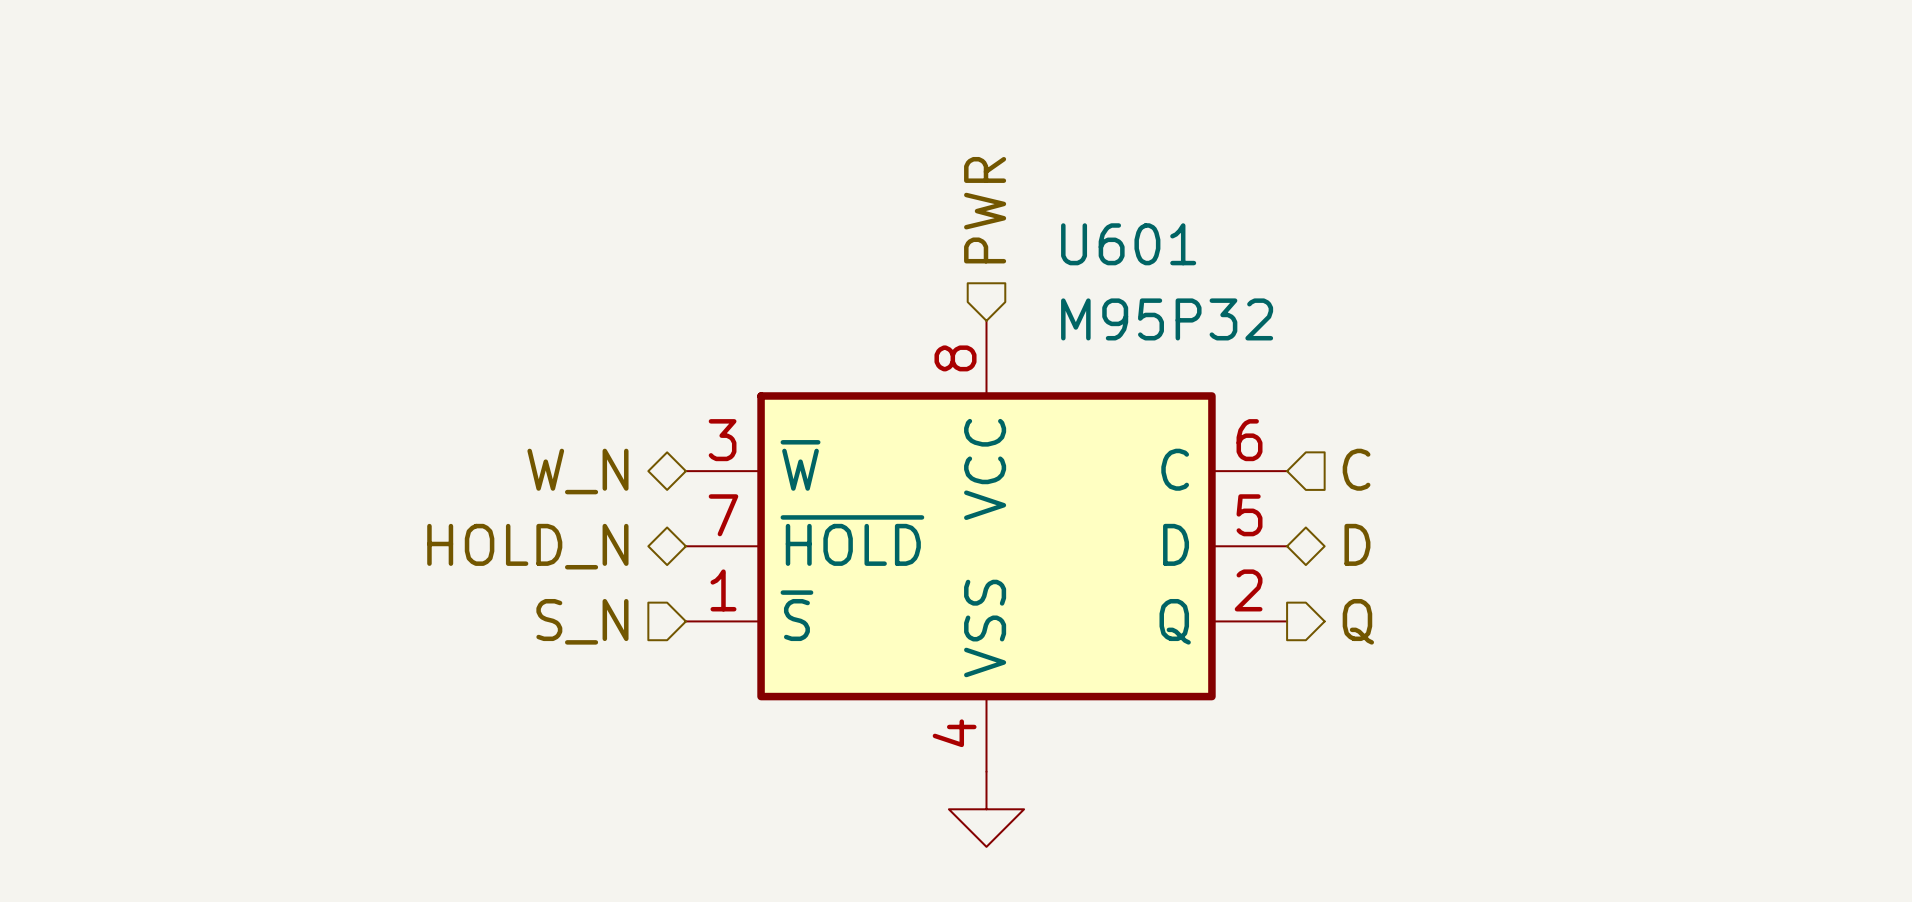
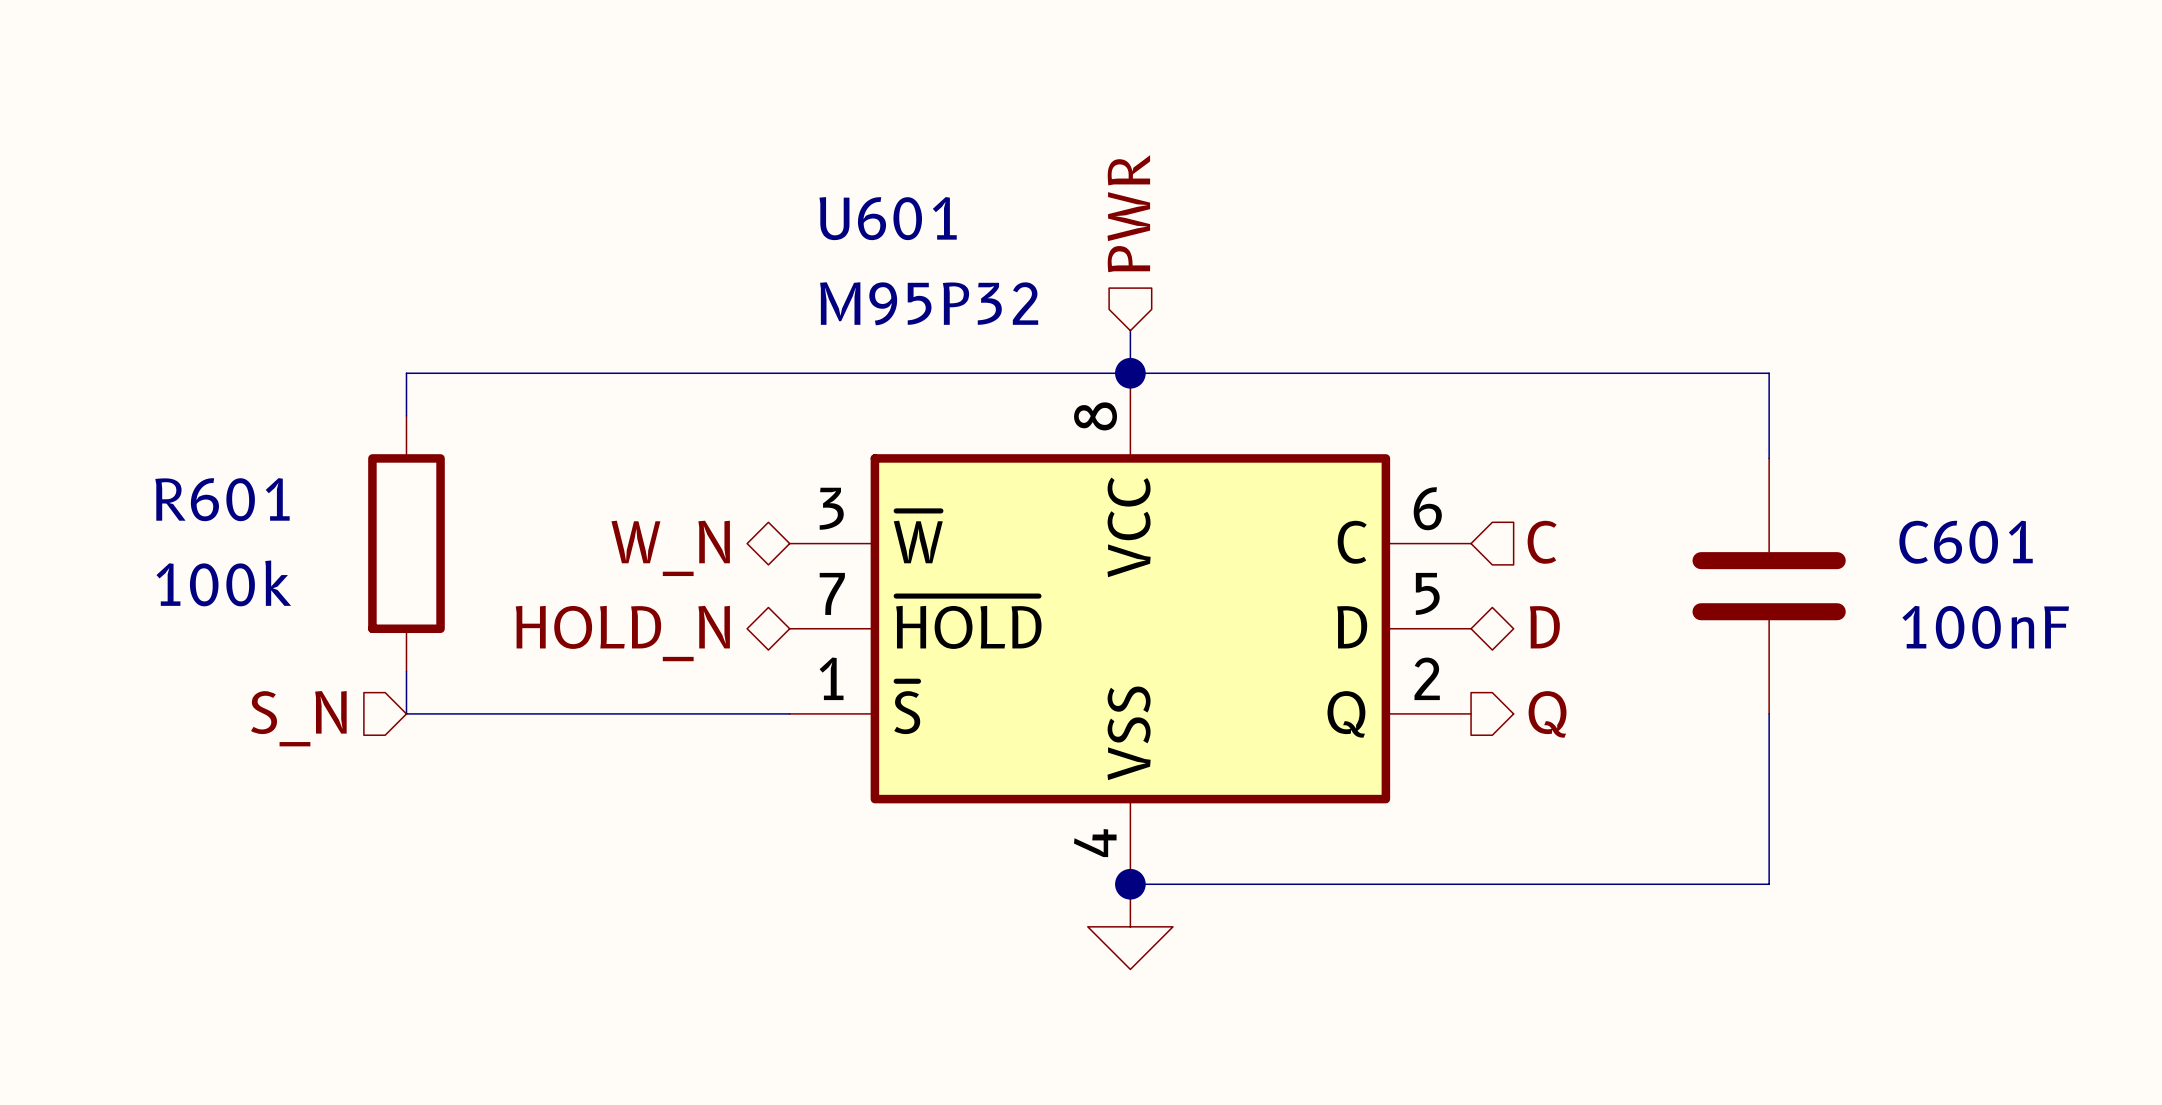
hierarchical label position: PWR (985, 210) -> PWR (1128, 213)
U601 name position: U601 (1128, 244) -> U601 (888, 218)
wire: none -> (1130, 330) (1130, 373)
U601 value position: M95P32 (1167, 319) -> M95P32 (929, 303)
junction: none -> (1130, 373)
wire: none -> (406, 415) (406, 373) (1769, 373) (1769, 458)
R601: none -> 100k (406, 543)
C601: none -> 100nF (1769, 586)
wire: none -> (406, 671) (406, 713) (789, 713)
hierarchical label position: S_N (582, 621) -> S_N (298, 718)
wire: none -> (1769, 713) (1769, 884) (1130, 884)
junction: none -> (1130, 884)

